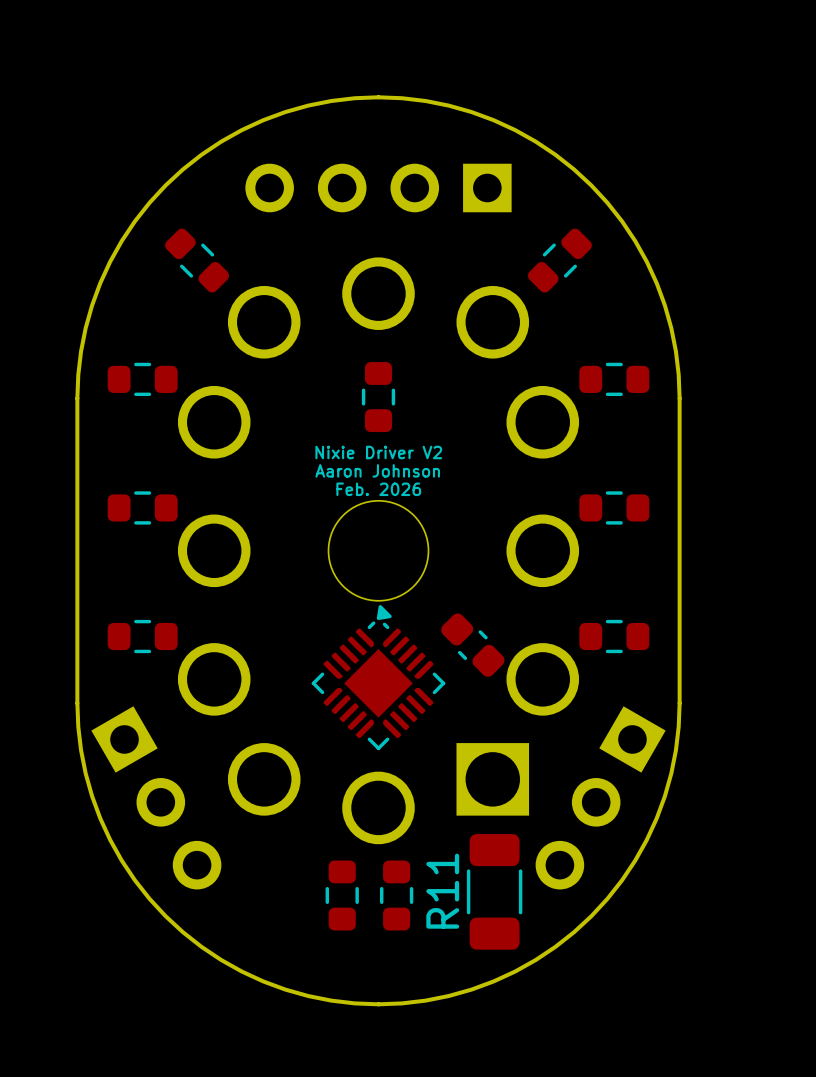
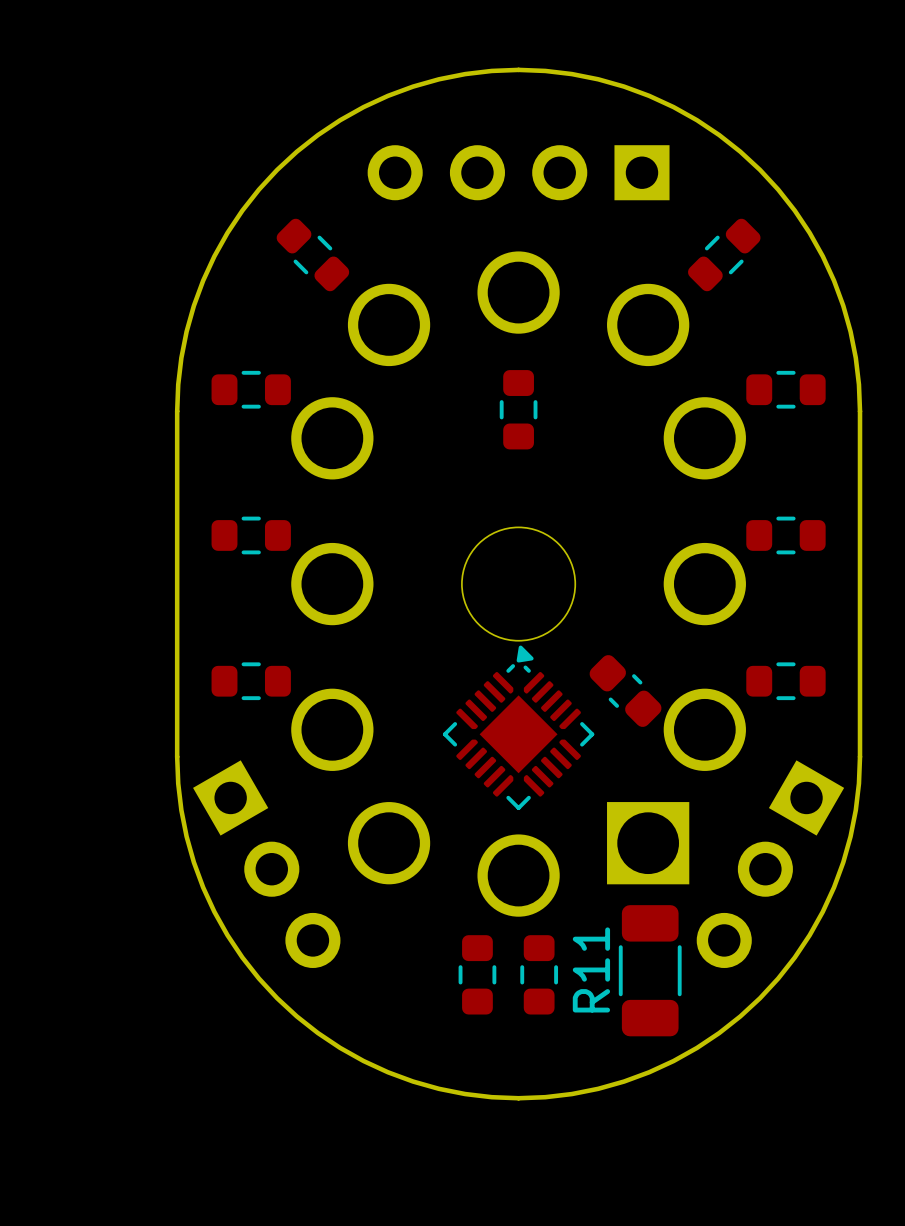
text: Nixie Driver V2 (378, 452) -> none
text: Aaron Johnson (377, 470) -> none
text: Feb. 2026 (378, 489) -> none

